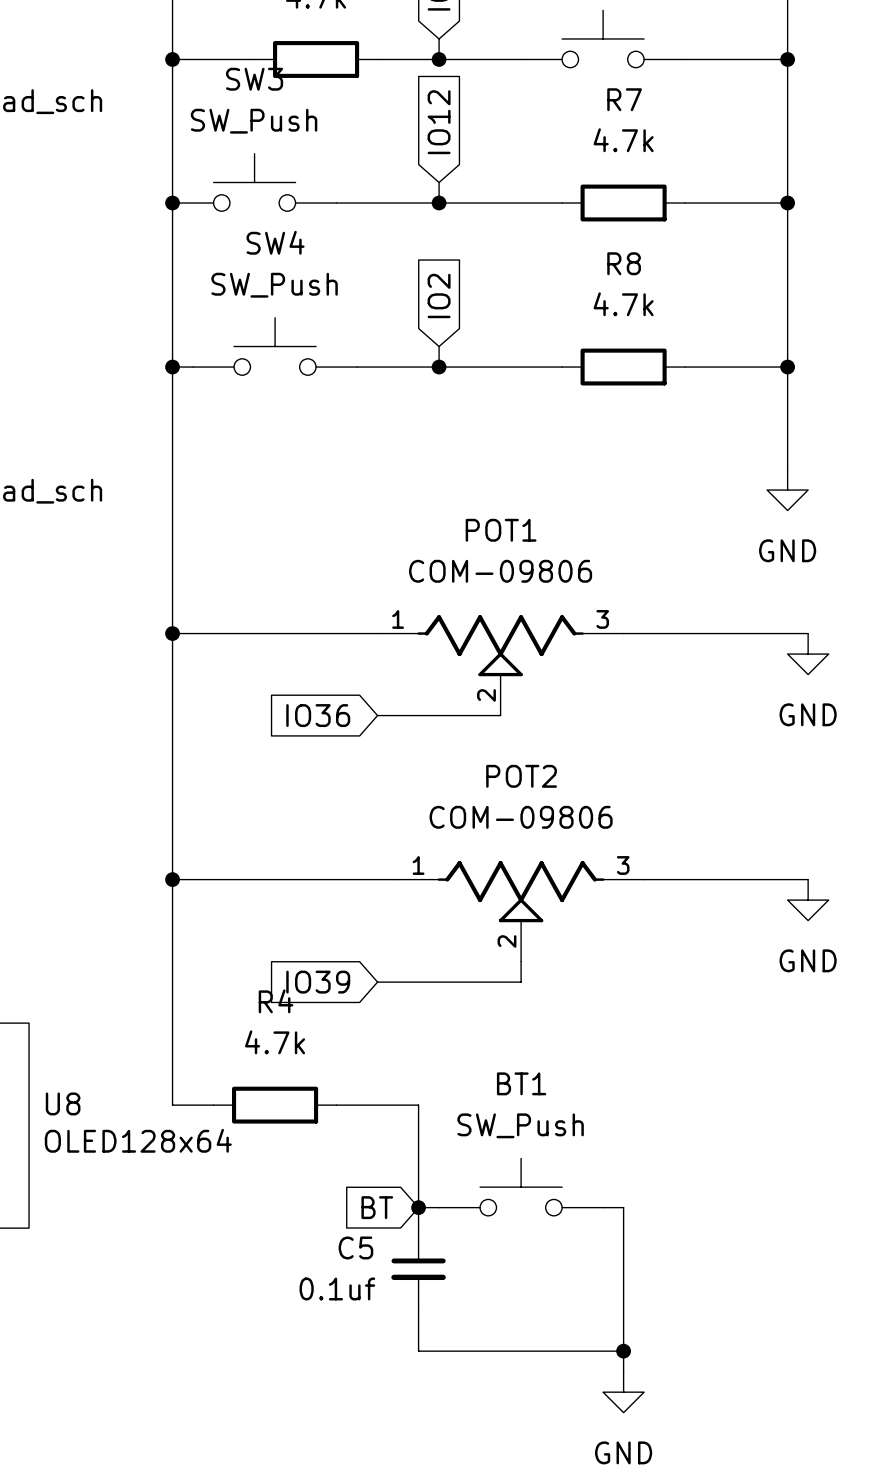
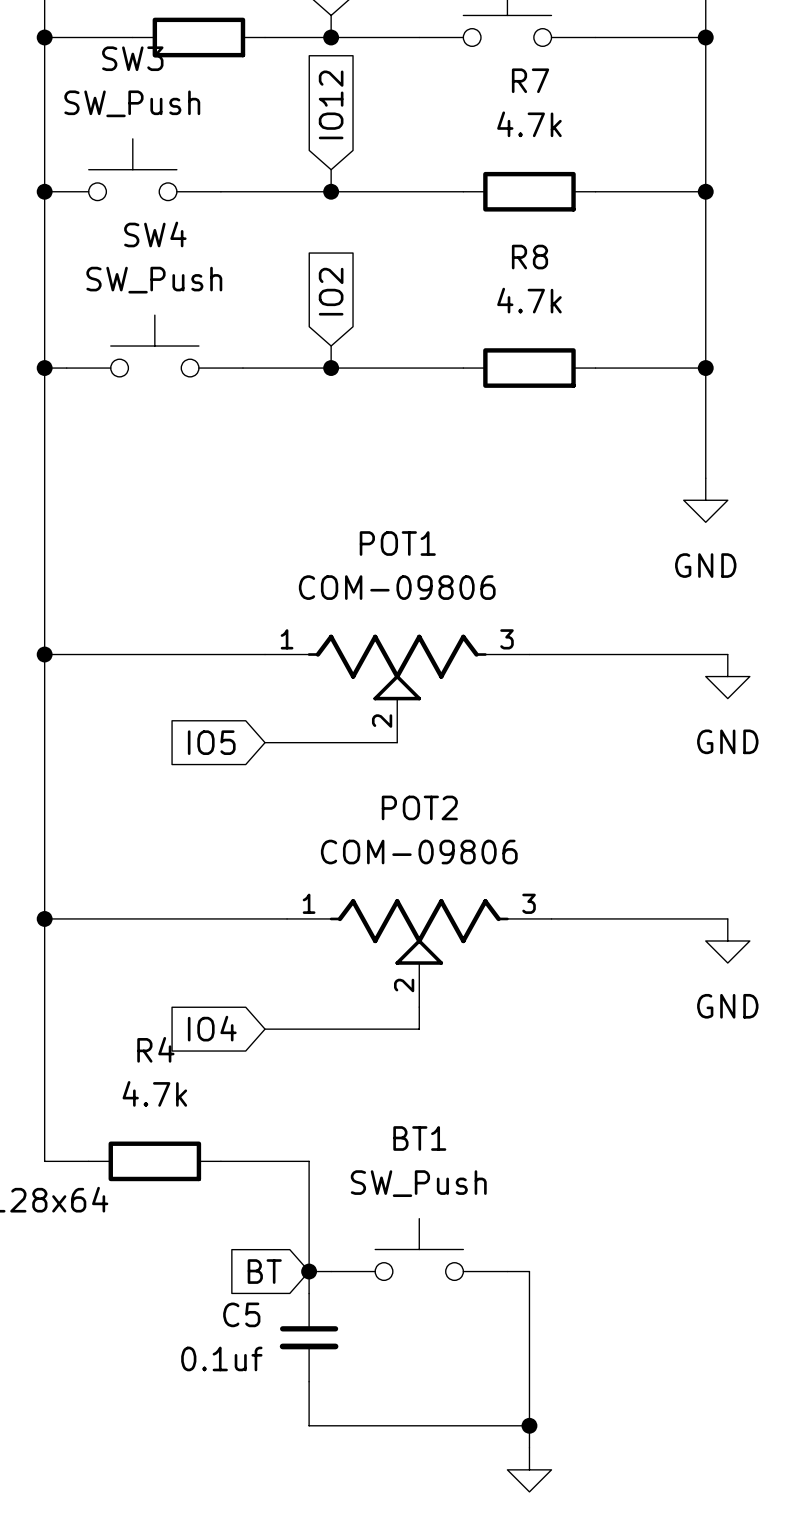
global label: IO36 (318, 715) -> IO5 (211, 742)
global label: IO39 (318, 982) -> IO4 (212, 1028)

